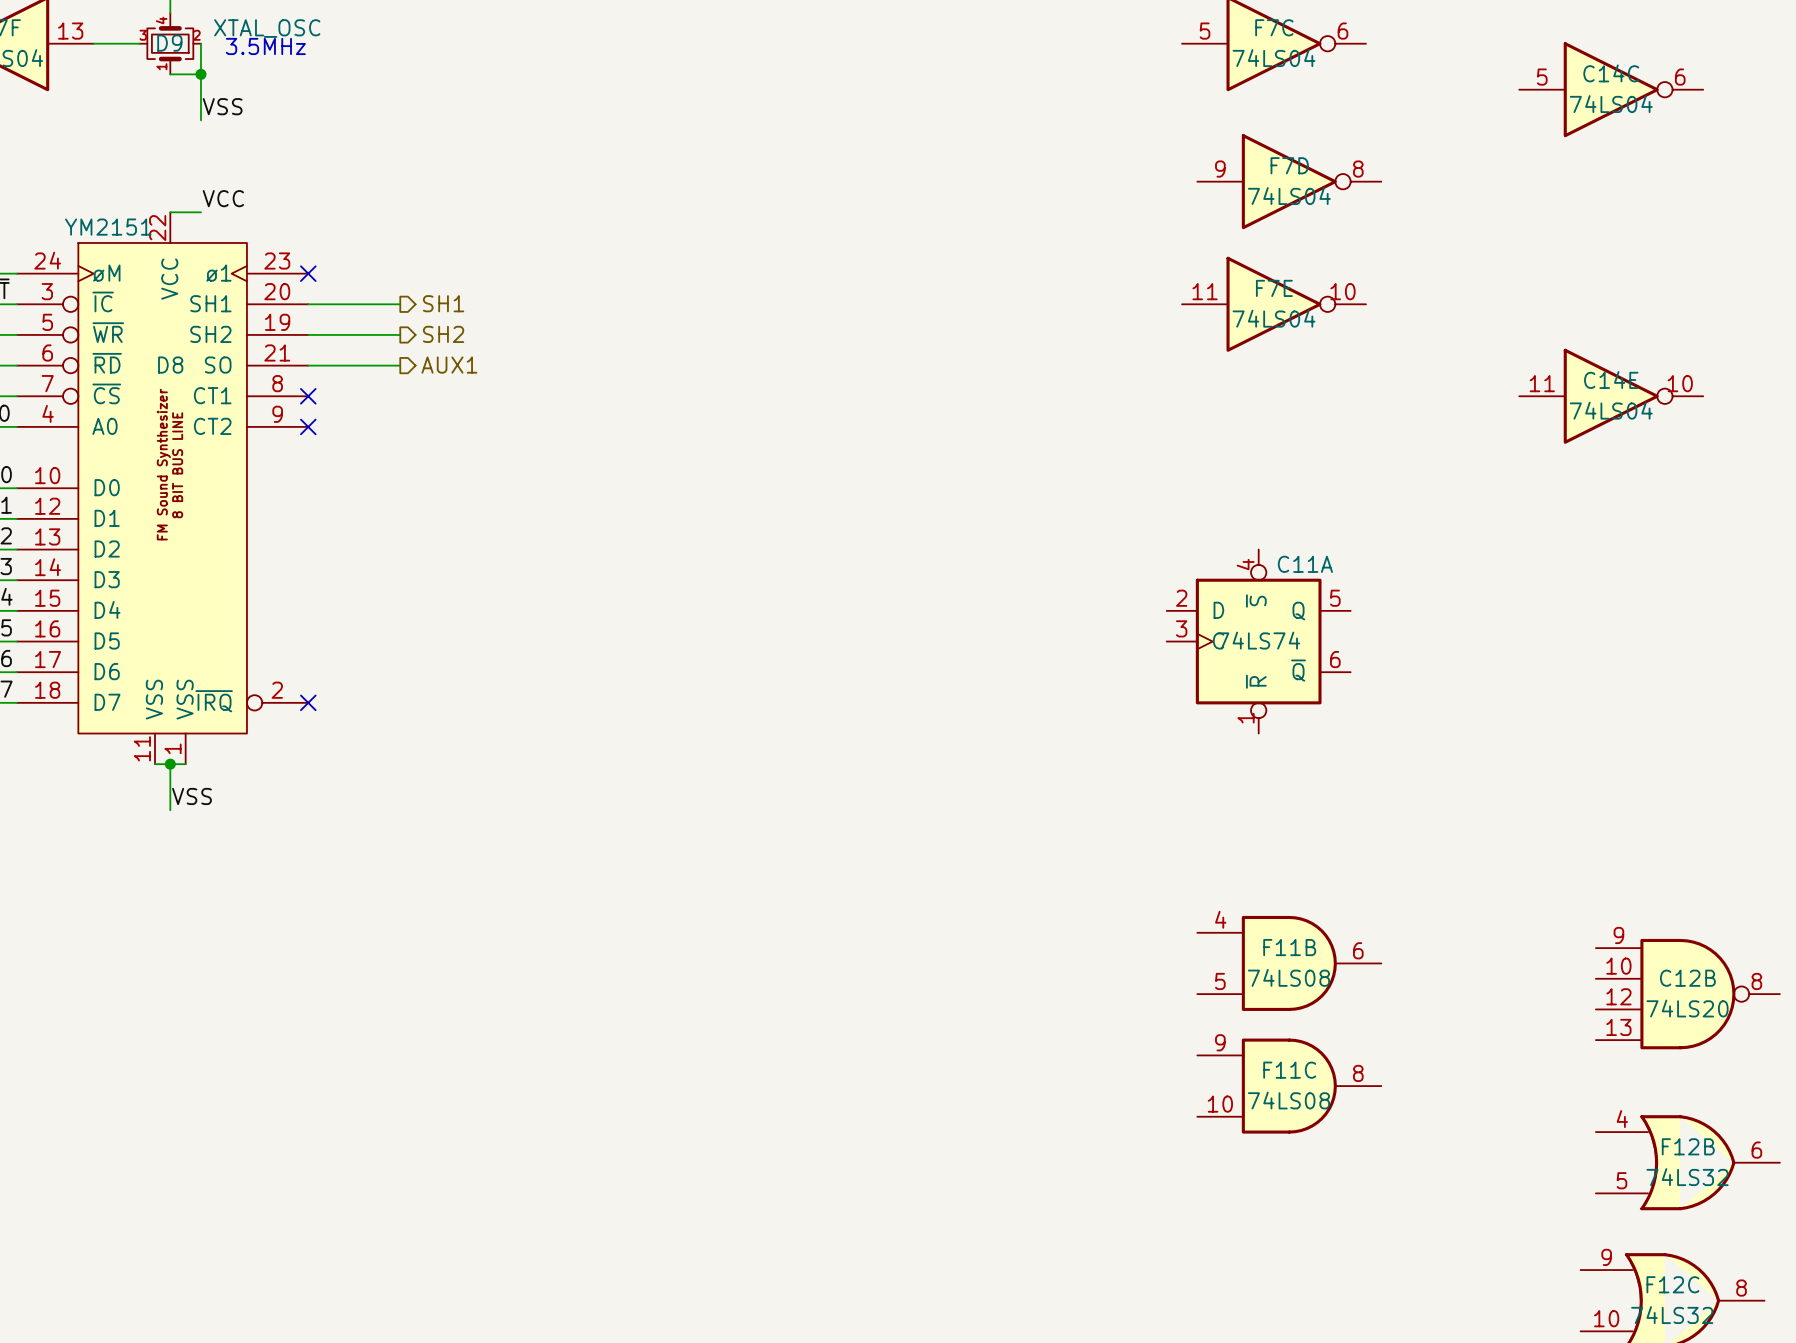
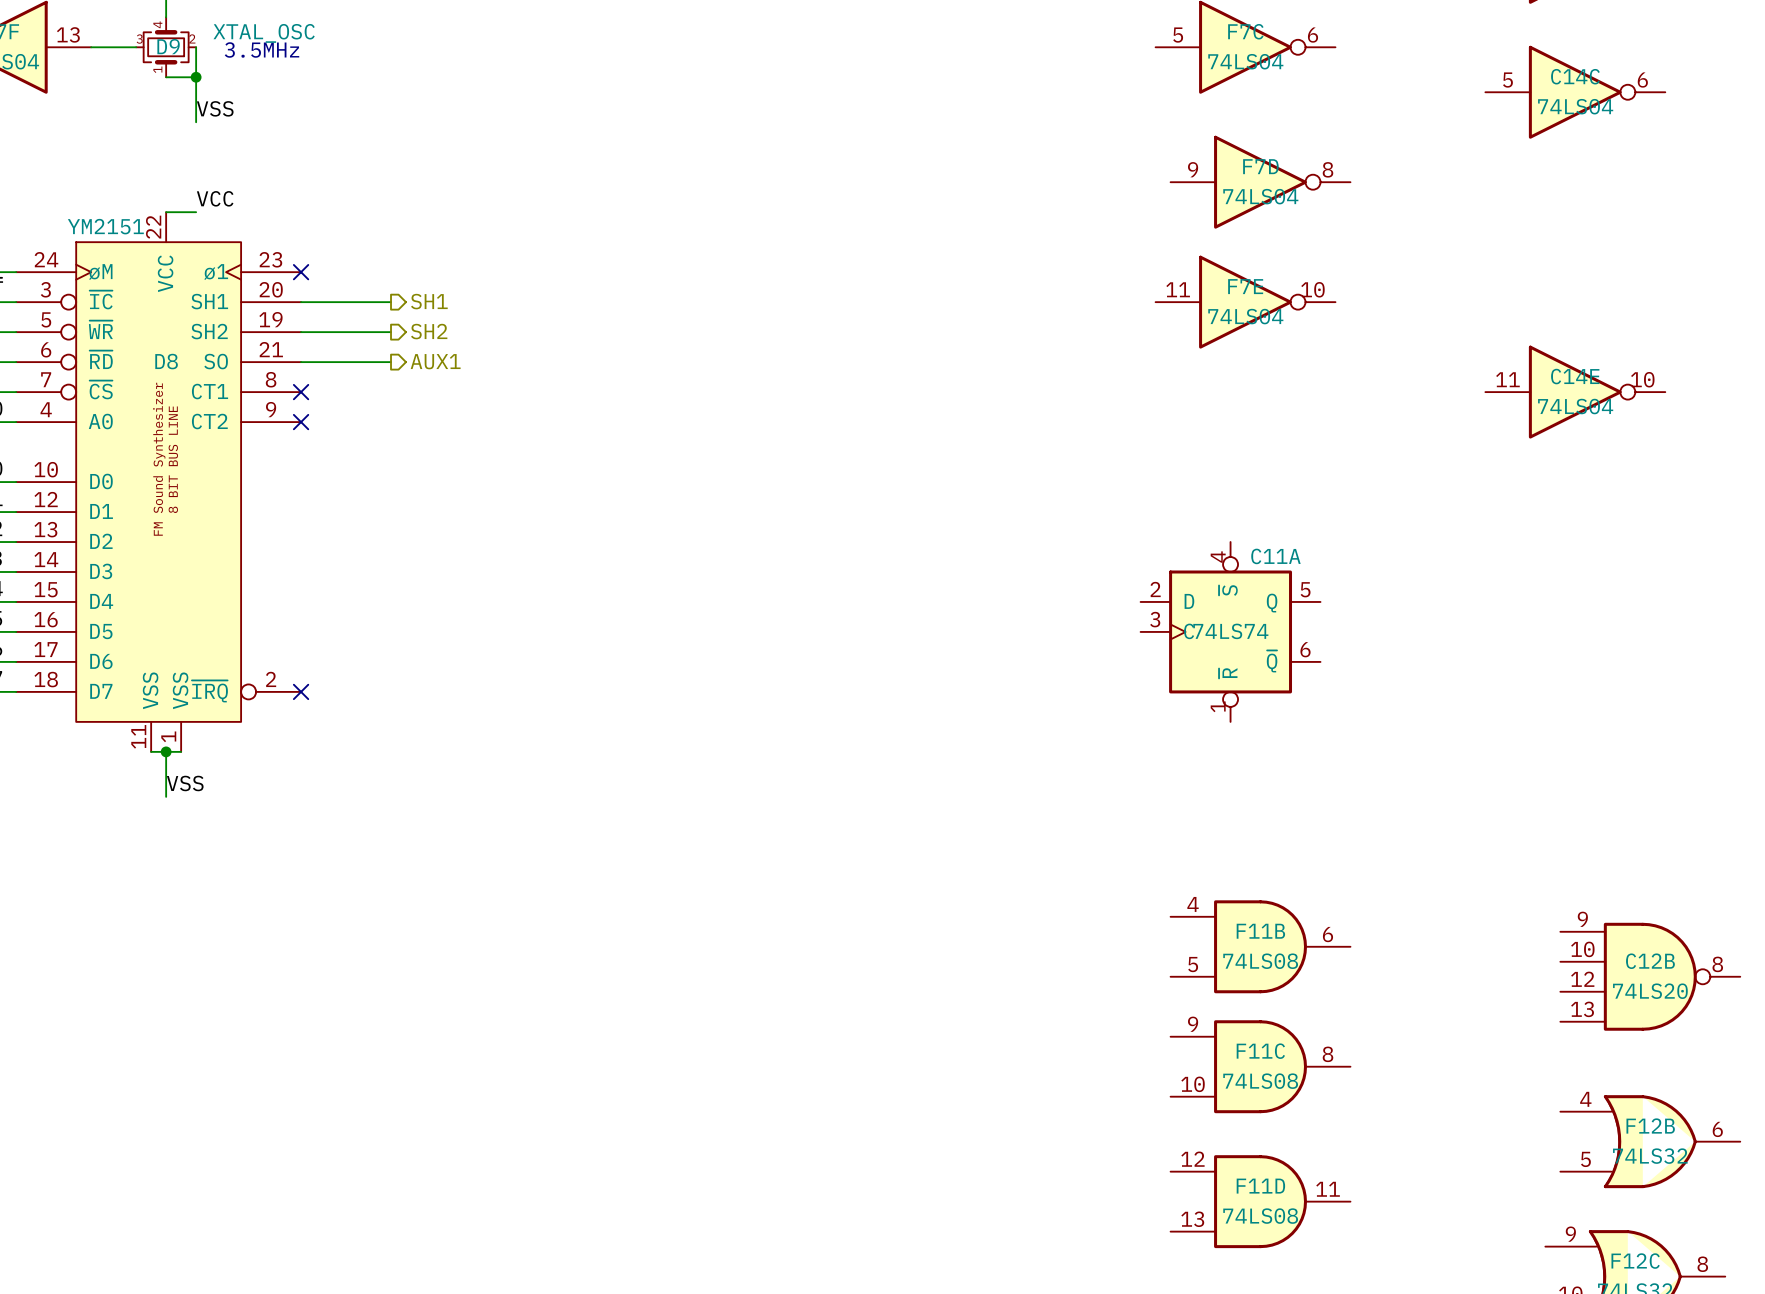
F11D: none -> 74LS08 (1260, 1201)

